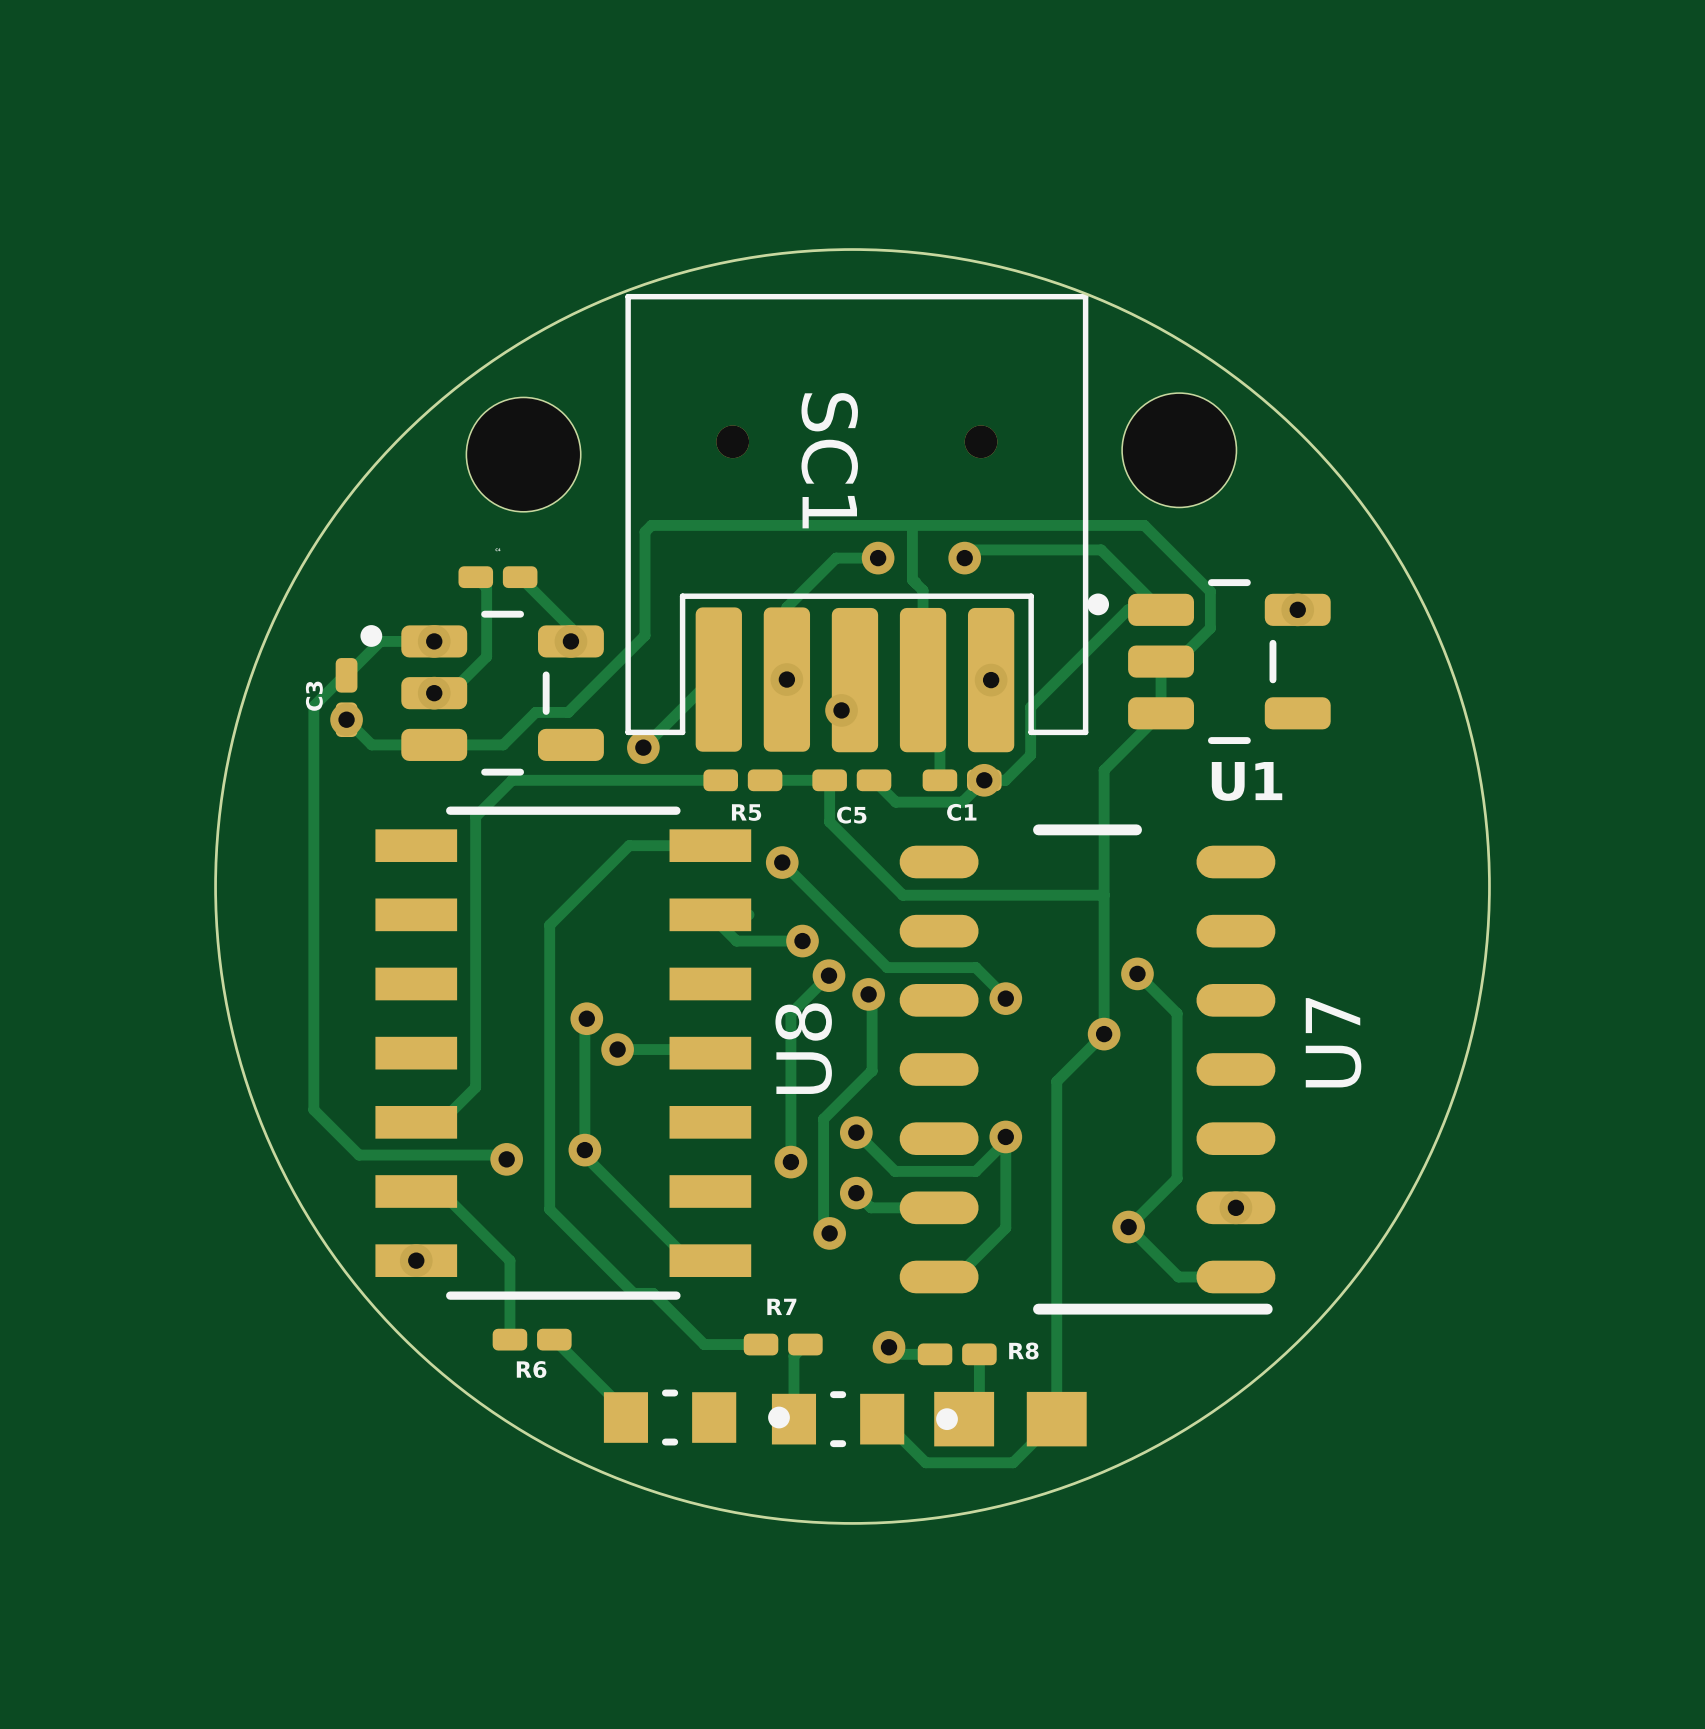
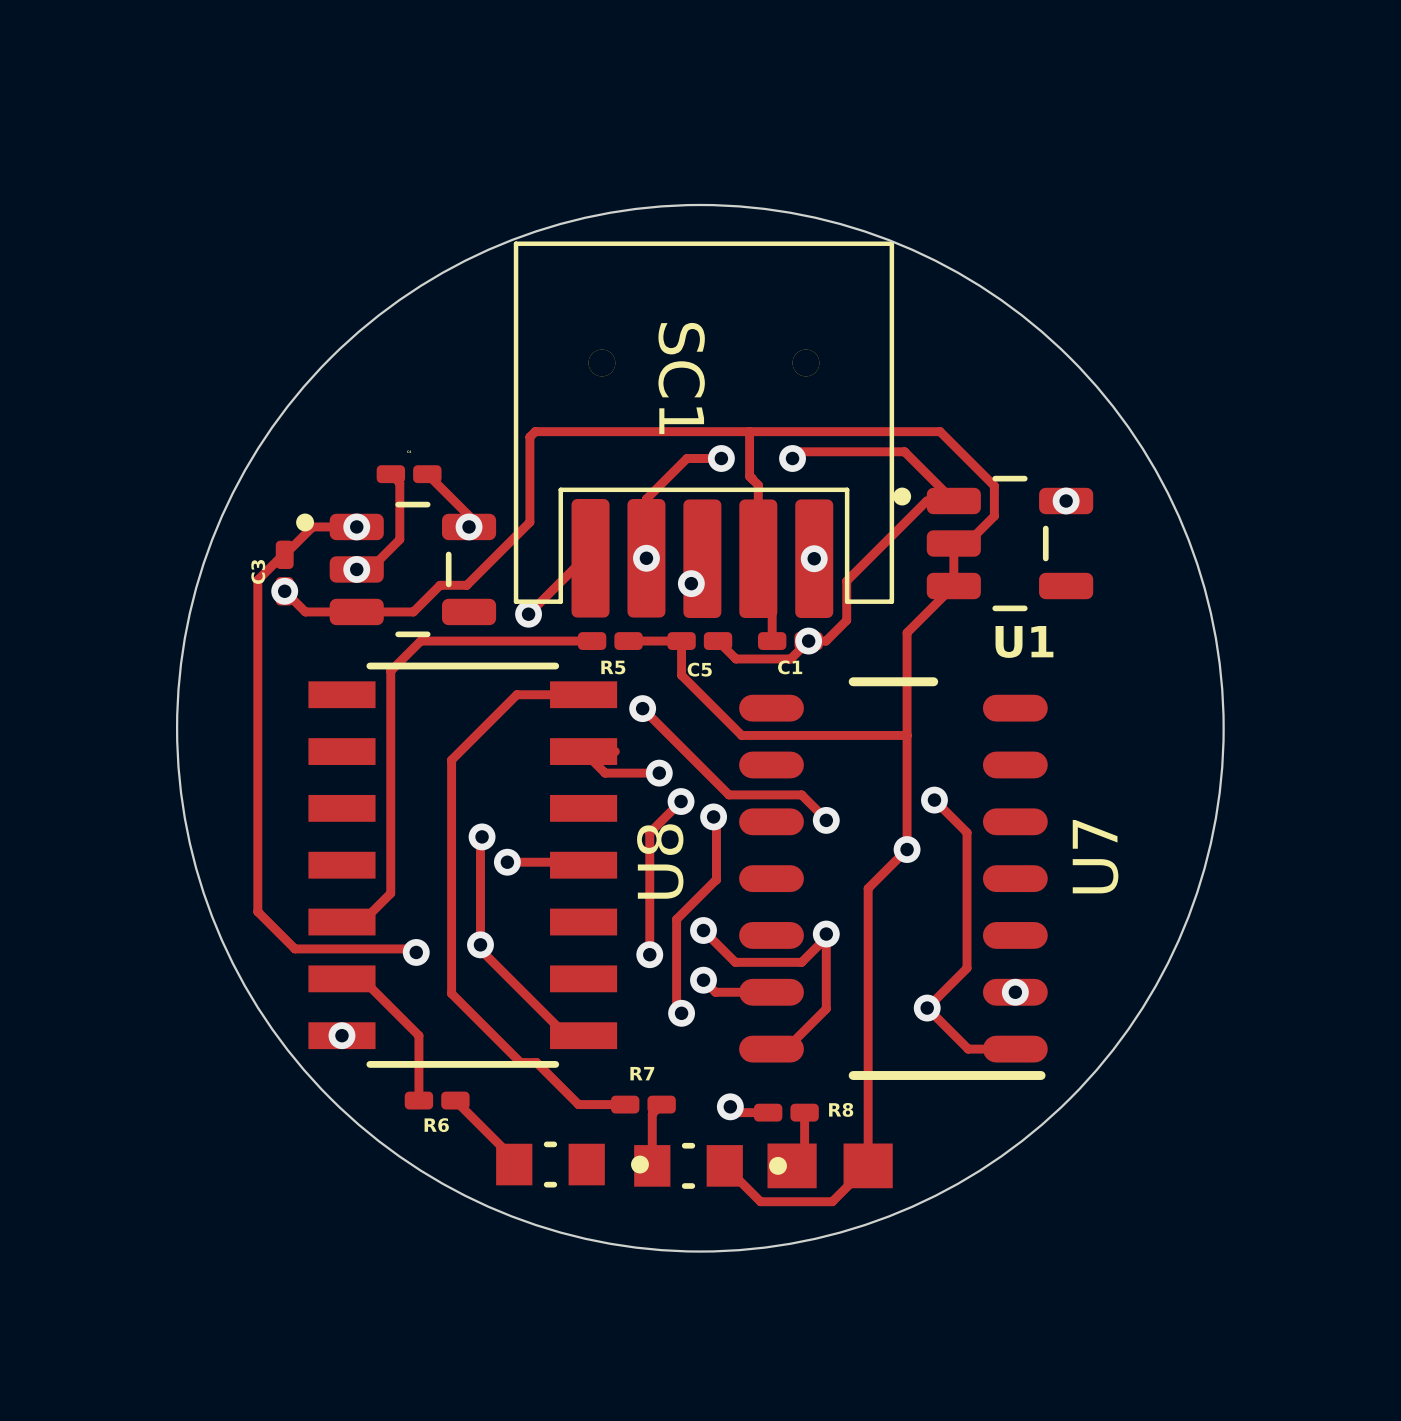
part: (1179, 450) -> none
part: (523, 454) -> none

